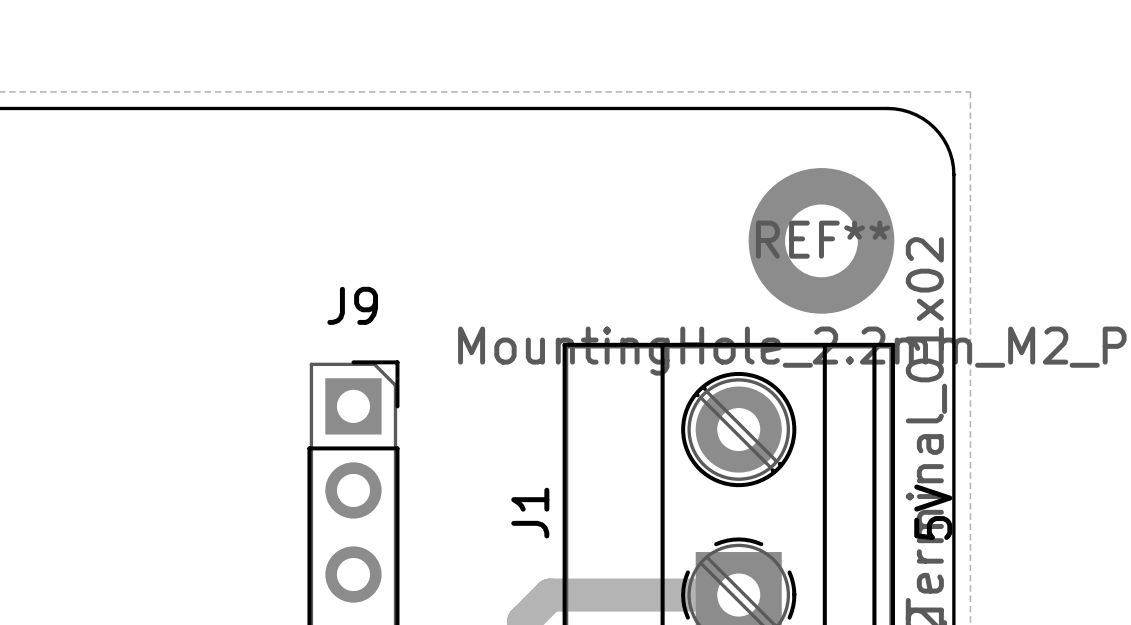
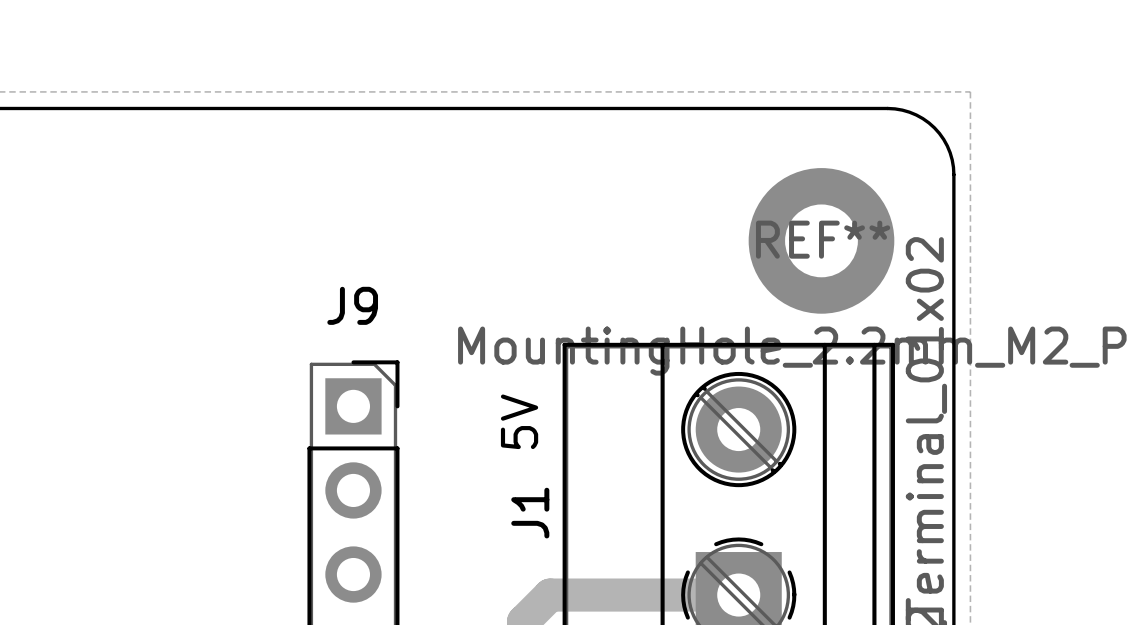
text position: 5V (933, 512) -> 5V (519, 421)

